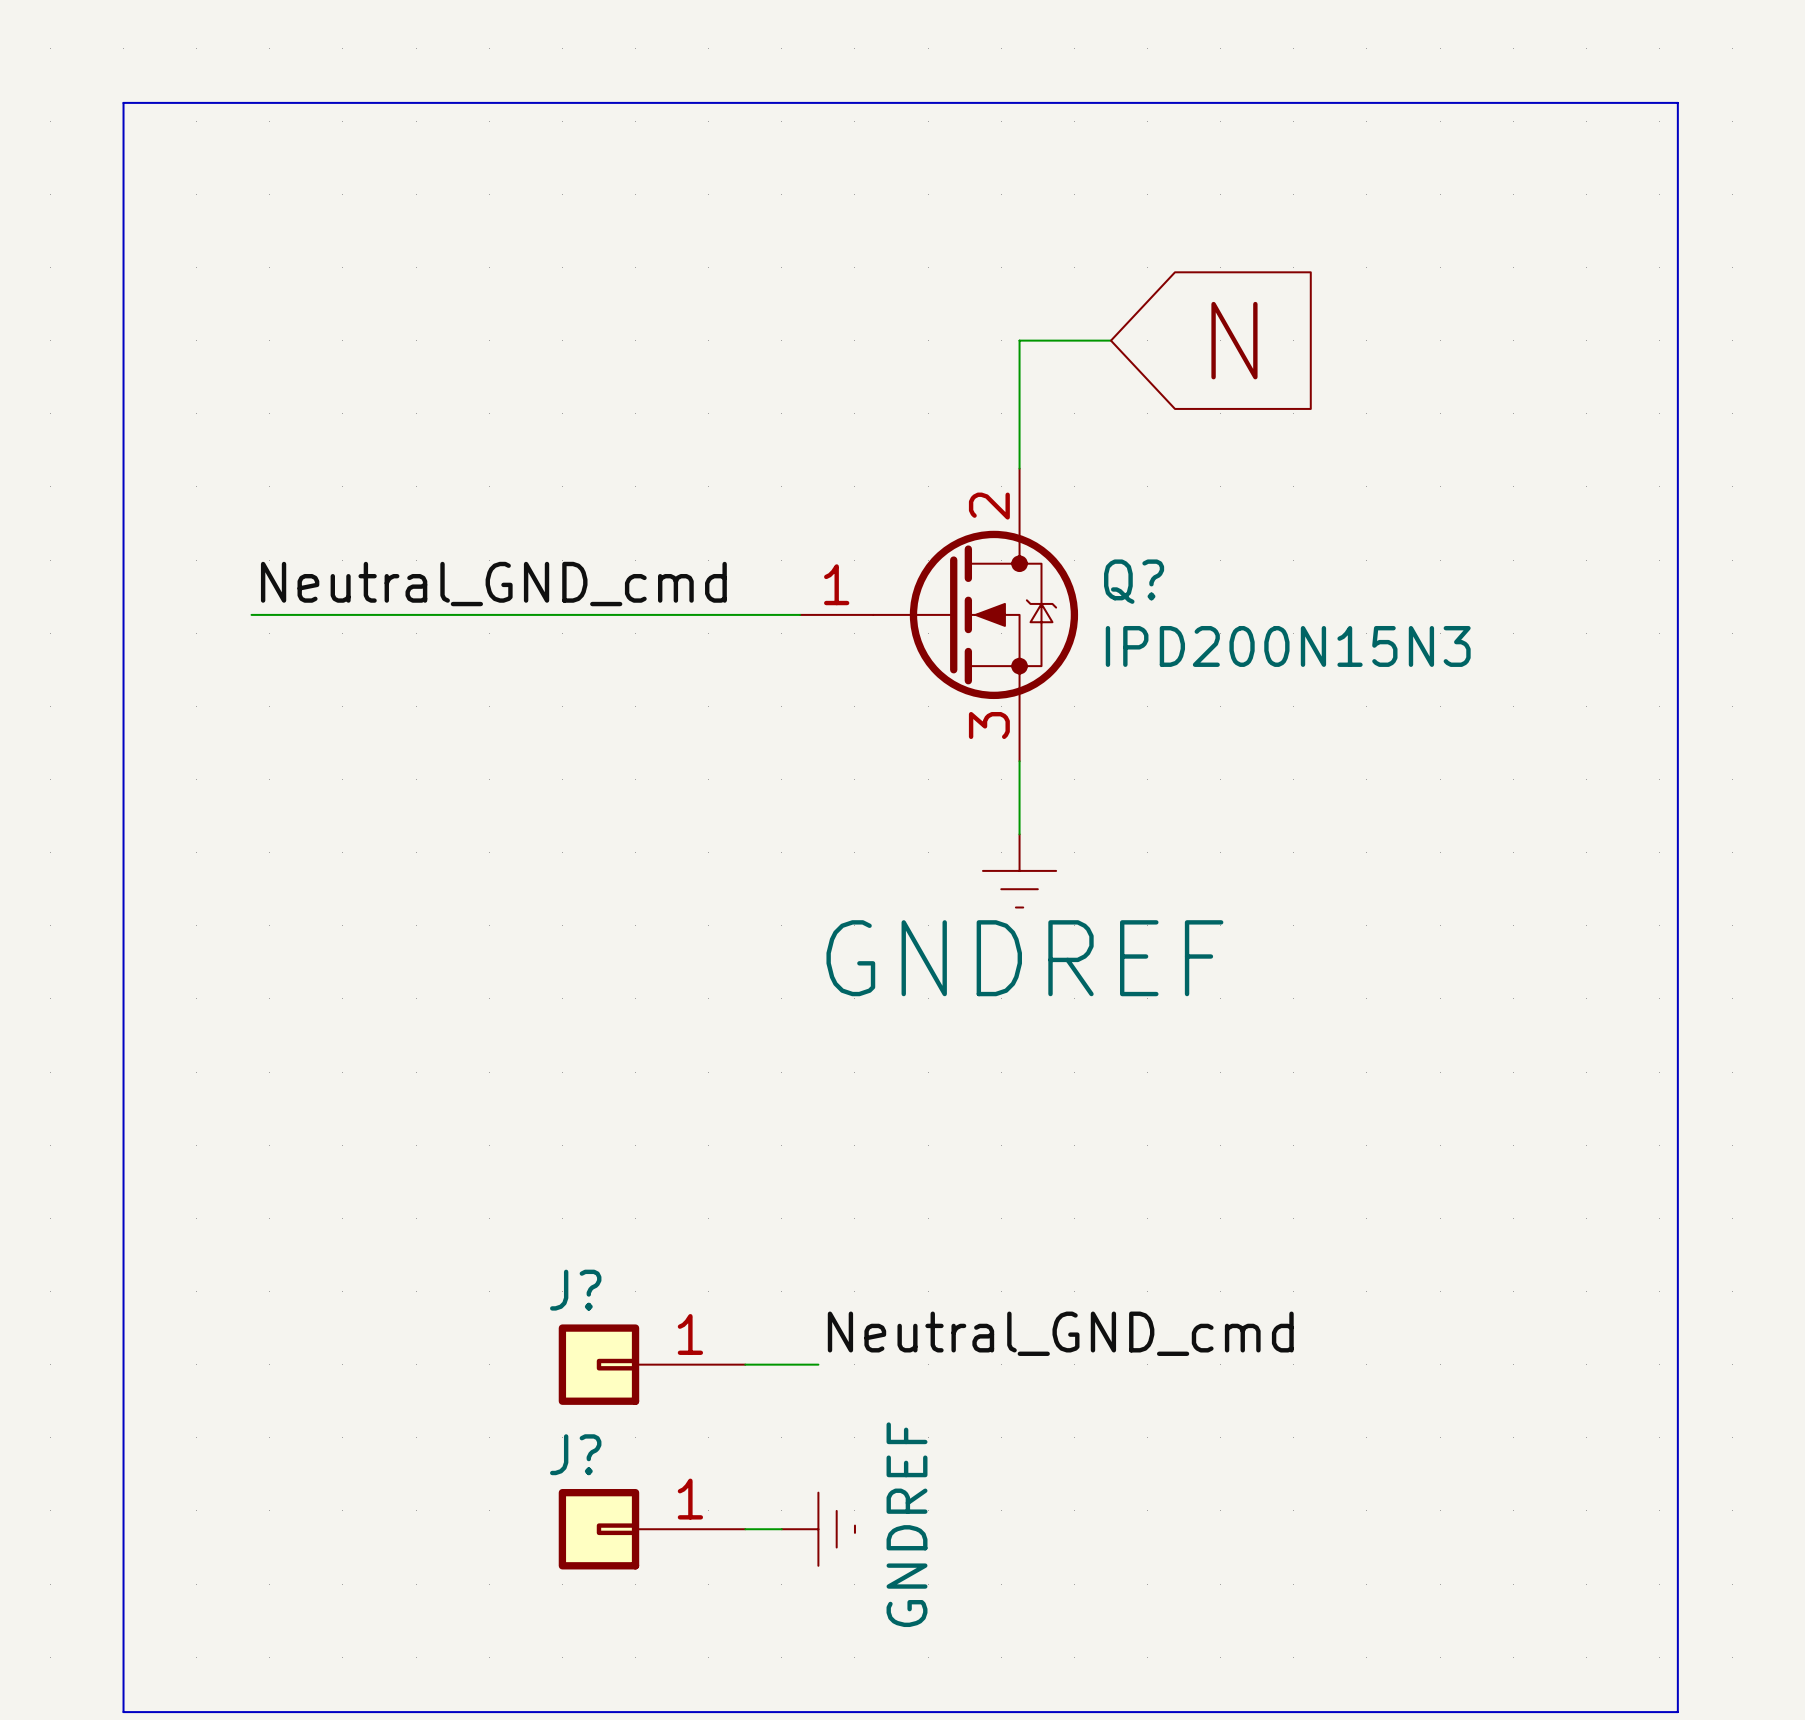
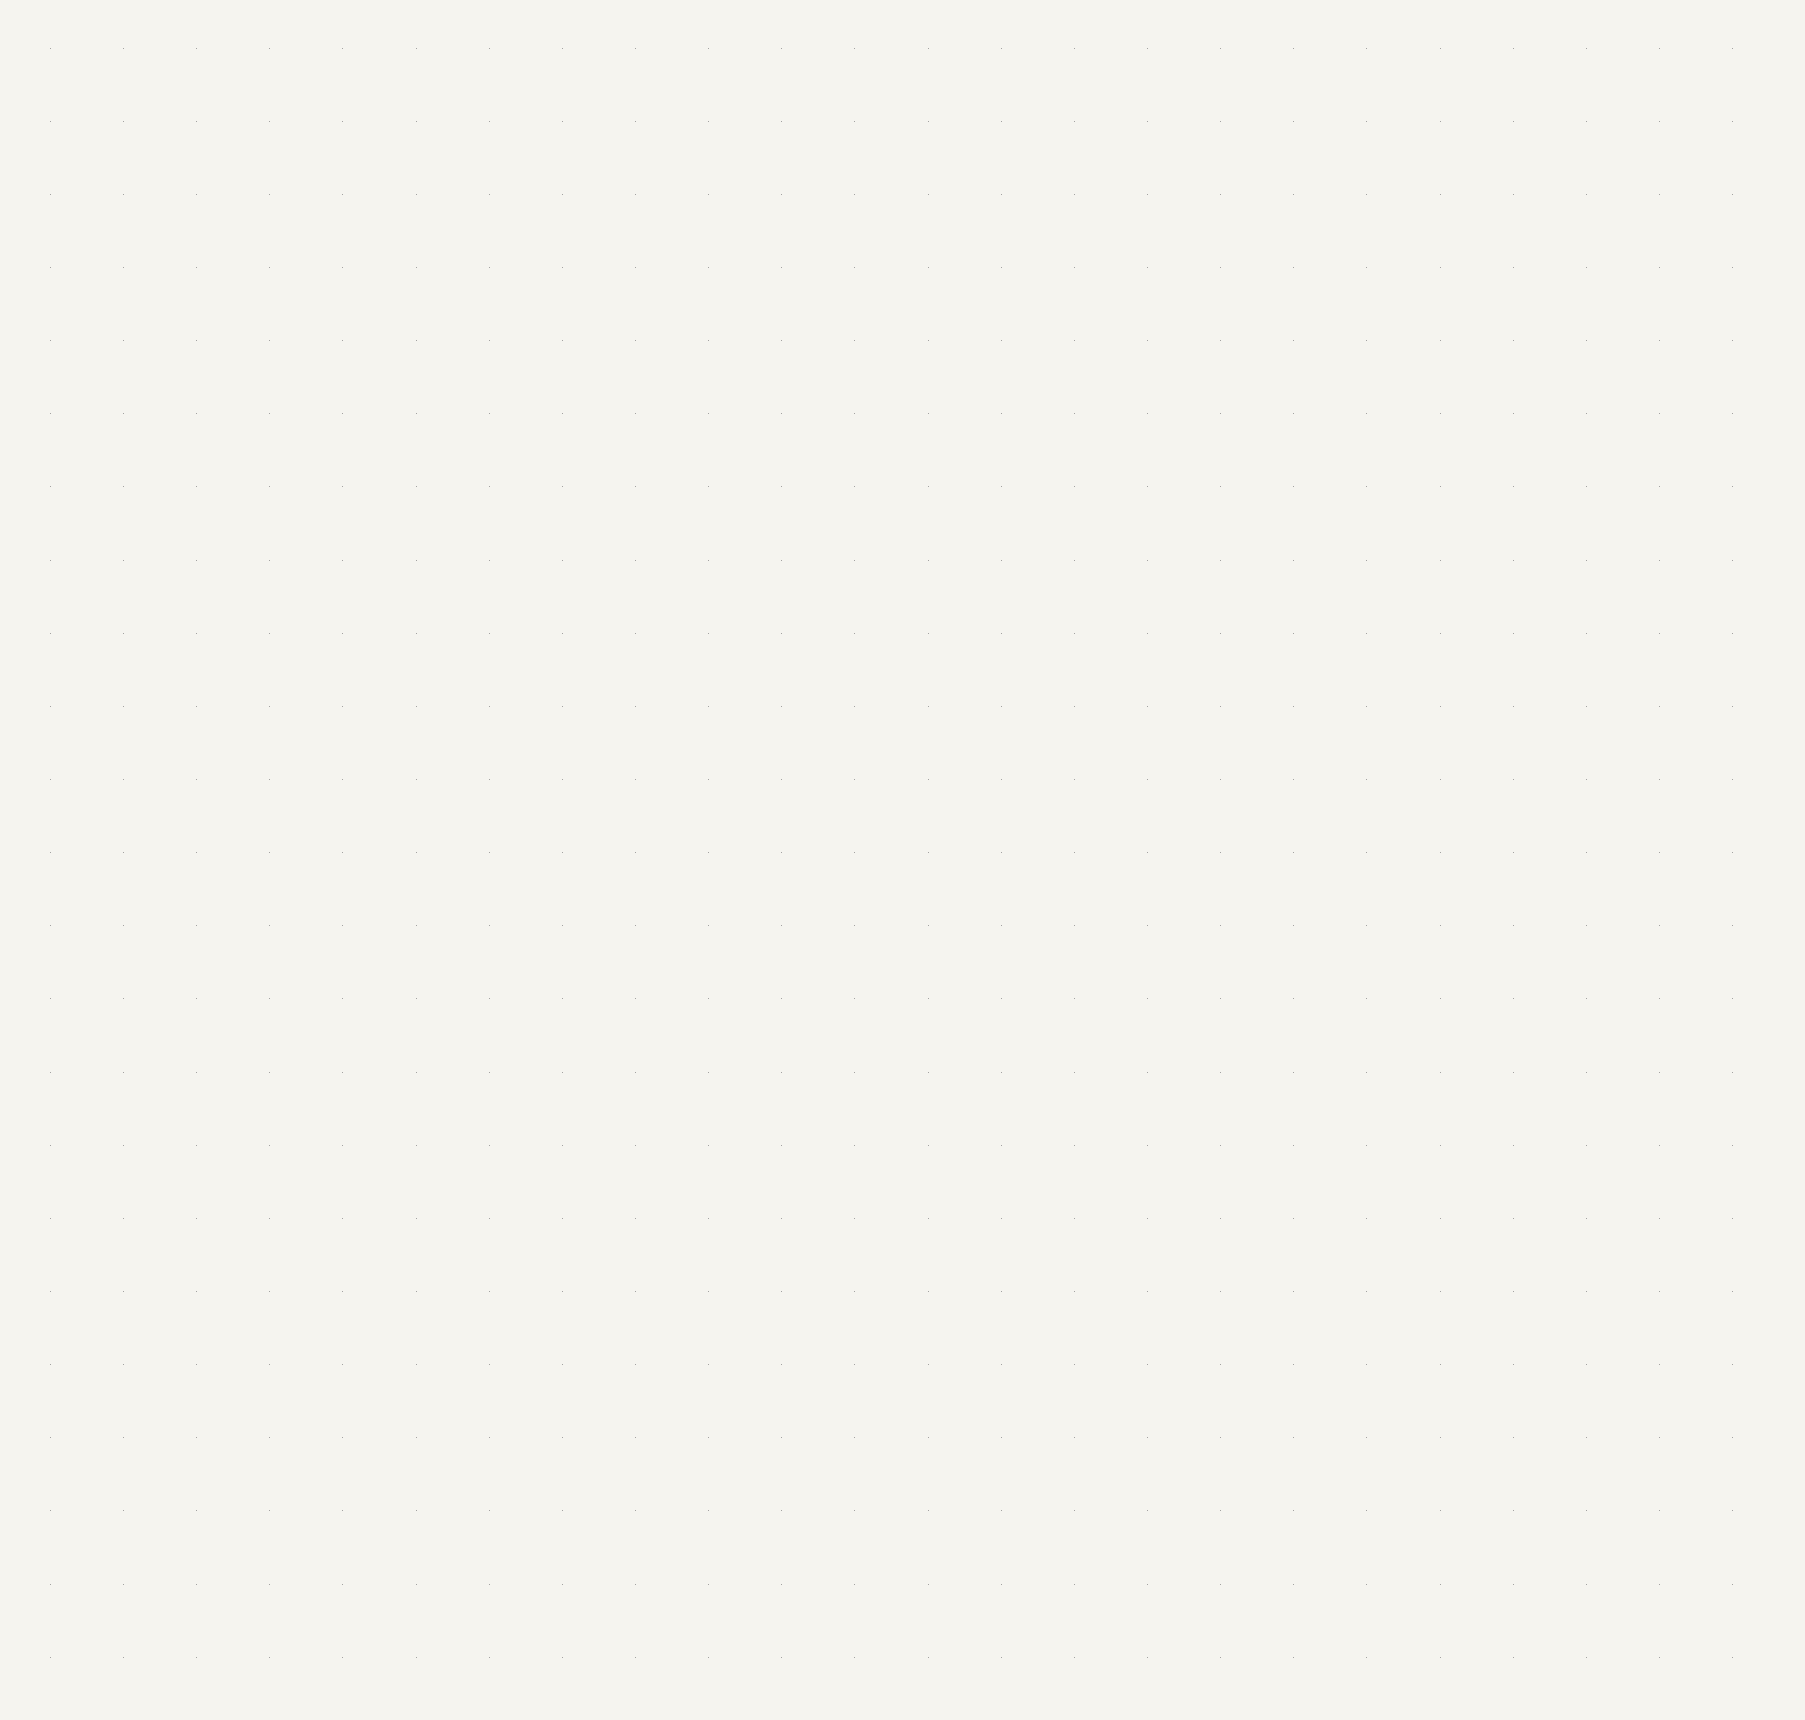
line: (123, 102) (123, 1712) (1677, 1712) (1677, 102) (123, 102) -> none
wire: (1110, 340) (1019, 340) (1019, 468) -> none
global label: N (1234, 340) -> none
label: Neutral_GND_cmd (493, 584) -> none
wire: (251, 614) (800, 614) -> none
Q?: IPD200N15N3 (939, 614) -> none
wire: (1019, 761) (1019, 834) -> none
power symbol: GNDREF (1019, 870) -> none
label: Neutral_GND_cmd (1060, 1333) -> none
J?: (652, 1364) -> none
wire: (745, 1364) (818, 1364) -> none
J?: (652, 1529) -> none
wire: (745, 1529) (781, 1529) -> none
power symbol: GNDREF (818, 1529) -> none

